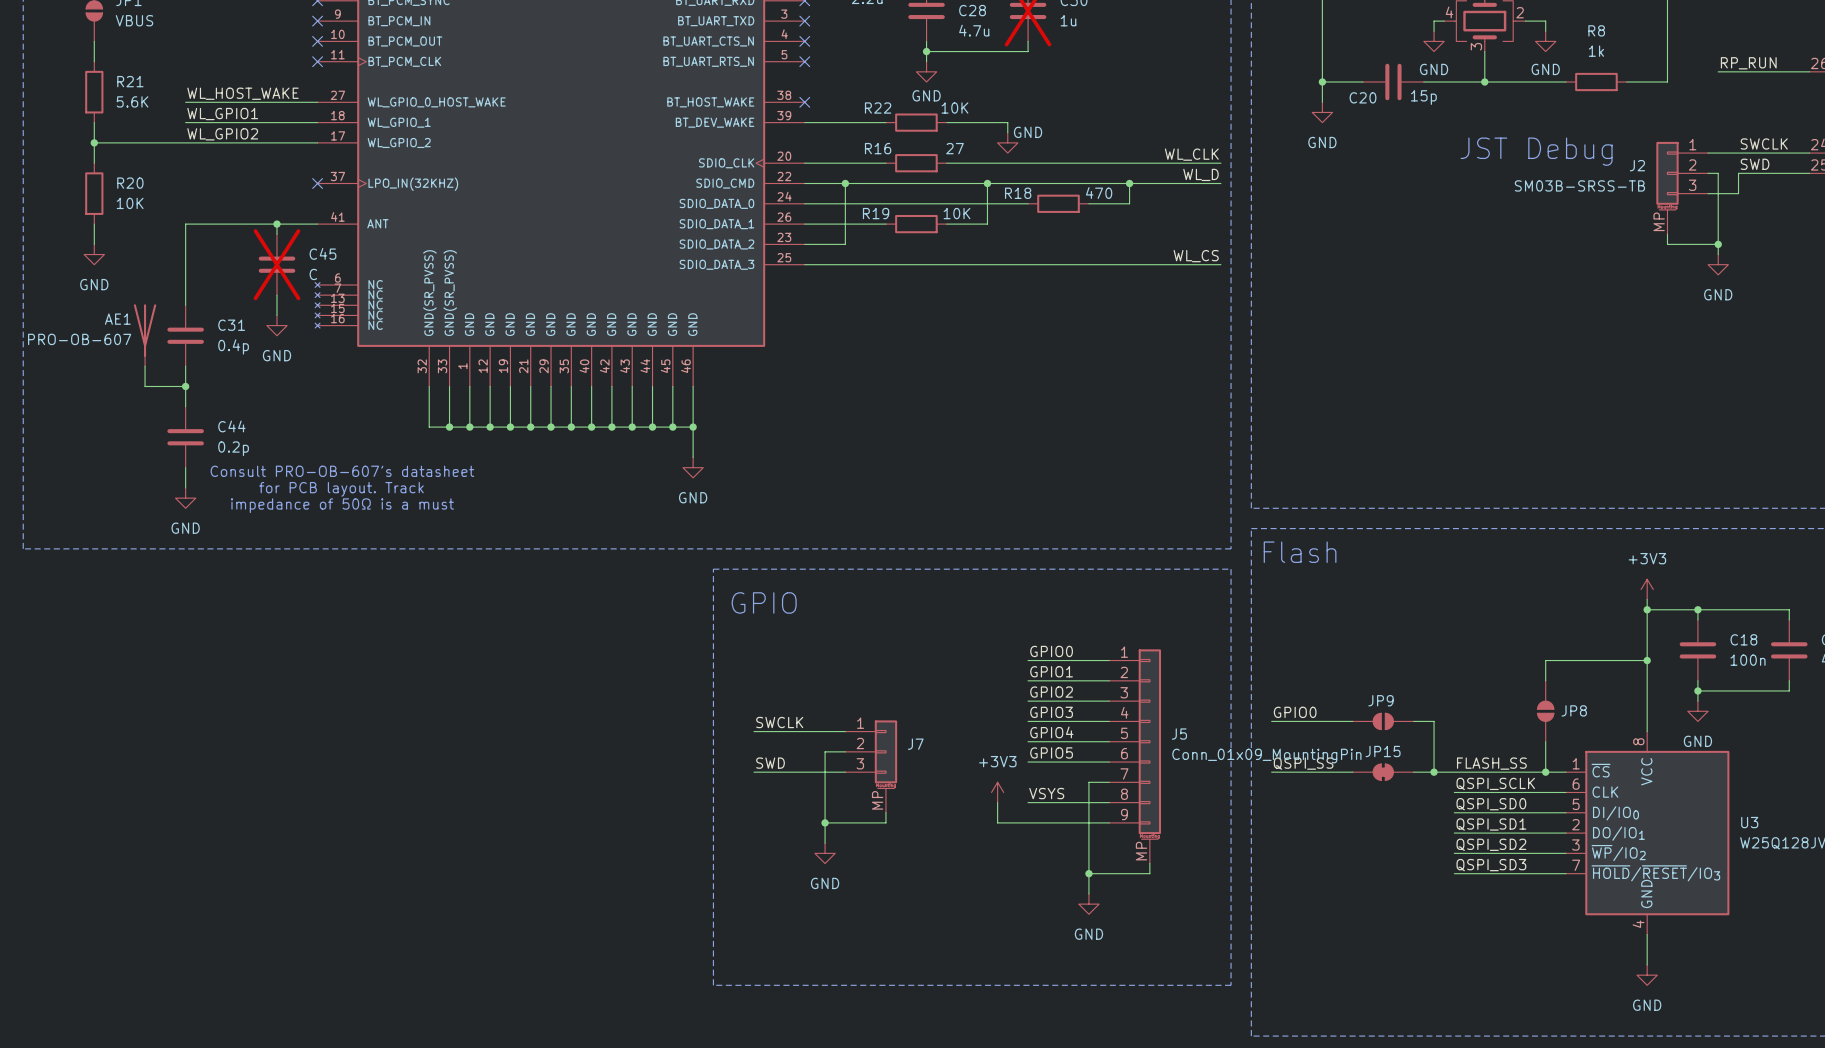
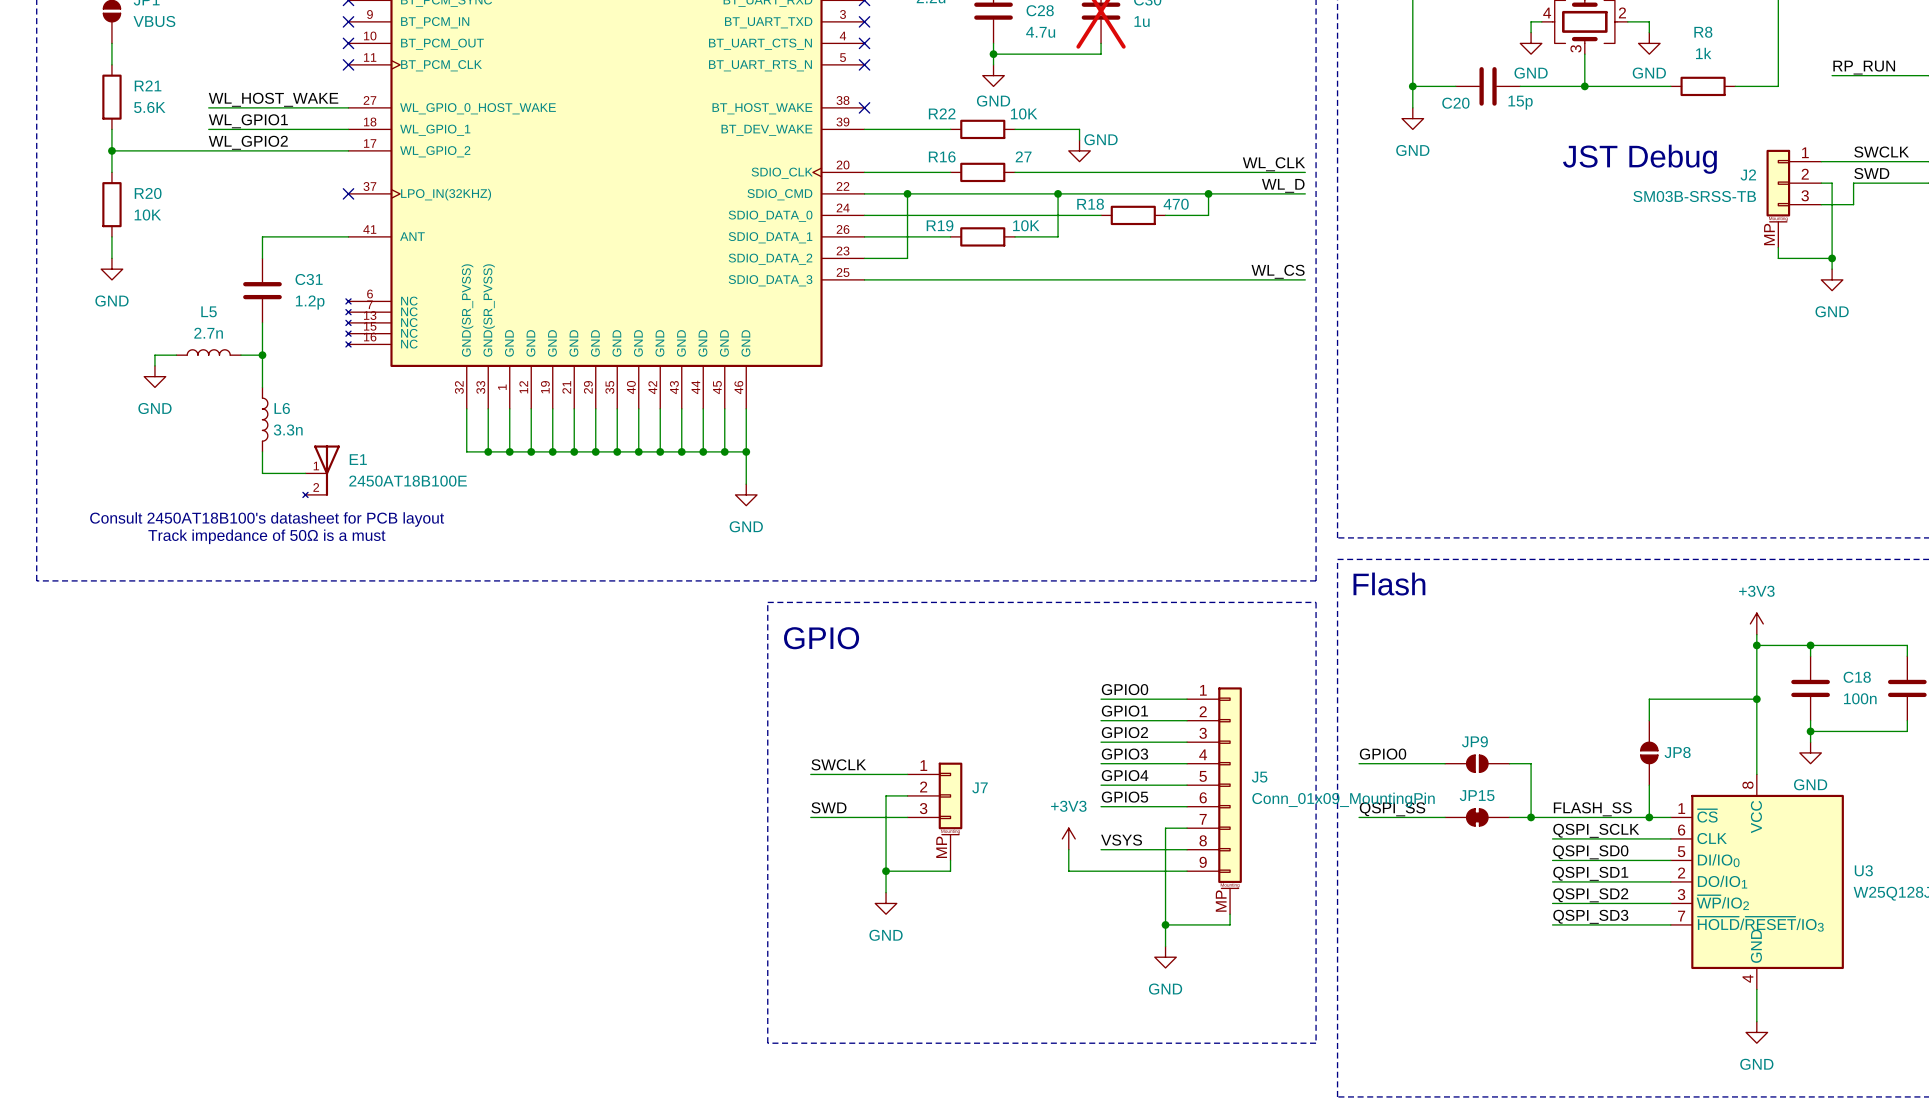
wire: (236, 224) (185, 224) (185, 305) -> (262, 236) (262, 258)
wire: (276, 224) (276, 234) -> none
junction: (276, 224) -> none
C45: C (276, 264) -> none
wire: (276, 295) (276, 315) -> none
wire: none -> (262, 322) (262, 387)
power symbol: GND (276, 325) -> none
L5: none -> 2.7n (208, 352)
AE1: PRO-OB-607 (145, 335) -> none
wire: none -> (176, 355) (154, 355) (154, 365)
C31 position: (185, 335) -> (262, 290)
wire: none -> (240, 355) (262, 355)
junction: none -> (262, 355)
C31 value: 0.4p (233, 346) -> 1.2p (310, 302)
power symbol: none -> GND (154, 376)
wire: (145, 366) (145, 386) (185, 386) -> (262, 451) (262, 473) (305, 473)
wire: (185, 366) (185, 406) -> none
junction: (185, 386) -> none
L6: none -> 3.3n (265, 419)
C44: 0.2p (185, 437) -> none
E1: none -> 2450AT18B100E (321, 471)
wire: (185, 467) (185, 487) -> none
text: Consult PRO-OB-607's datasheet (342, 471) -> none
text: for PCB layout. Track (341, 489) -> none
text: none -> Consult 2450AT18B100's datasheet for PCB layout (267, 519)
power symbol: GND (185, 498) -> none
text: impedance of 50Ω is a must (342, 505) -> Track impedance of 50Ω is a must (266, 536)

